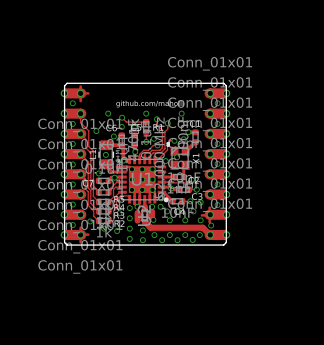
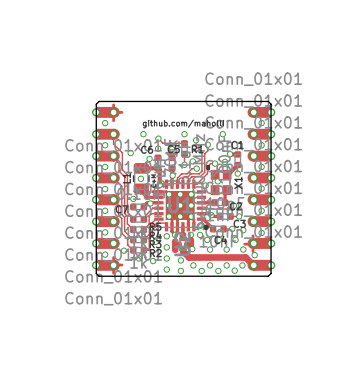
via: none -> (237, 173)

